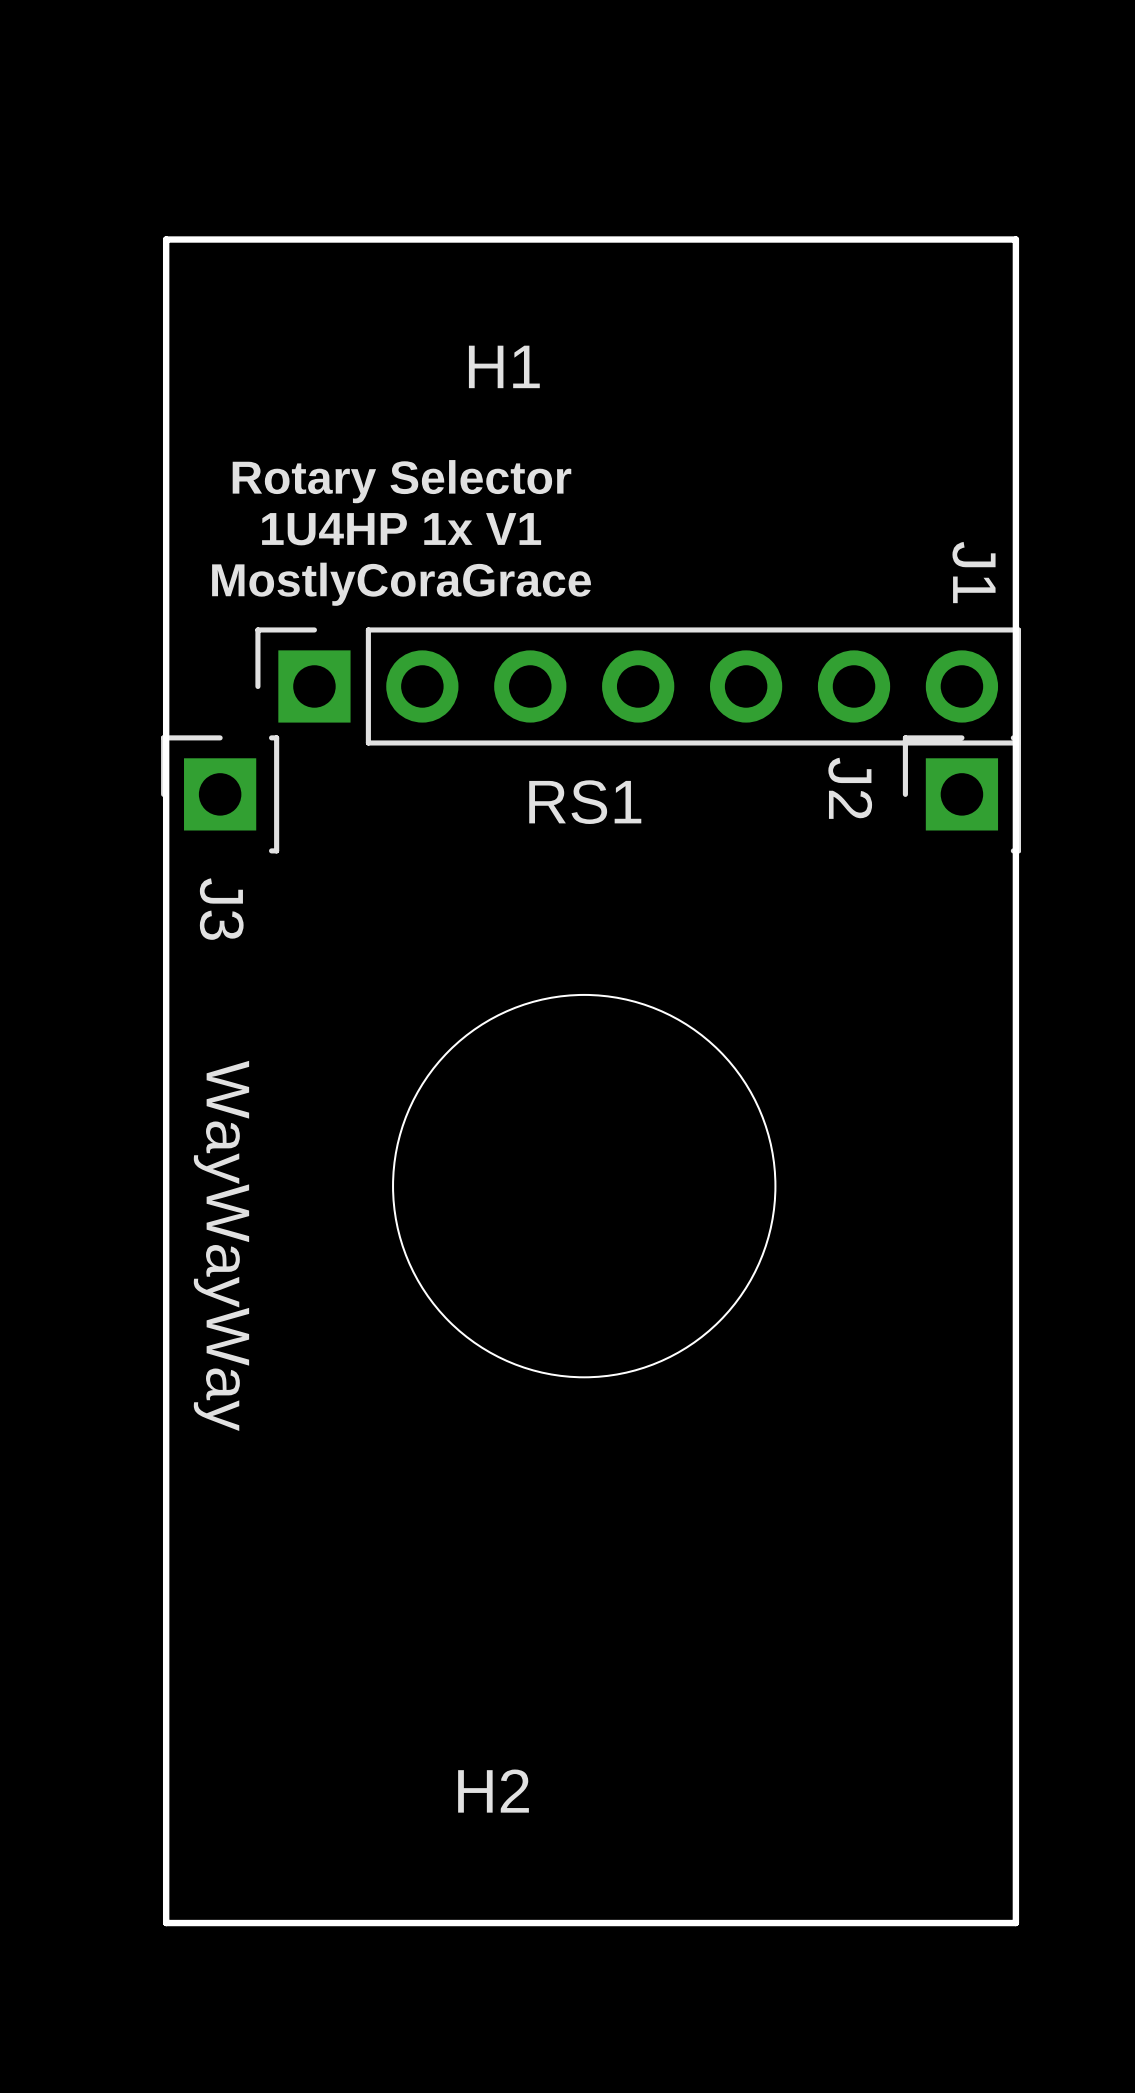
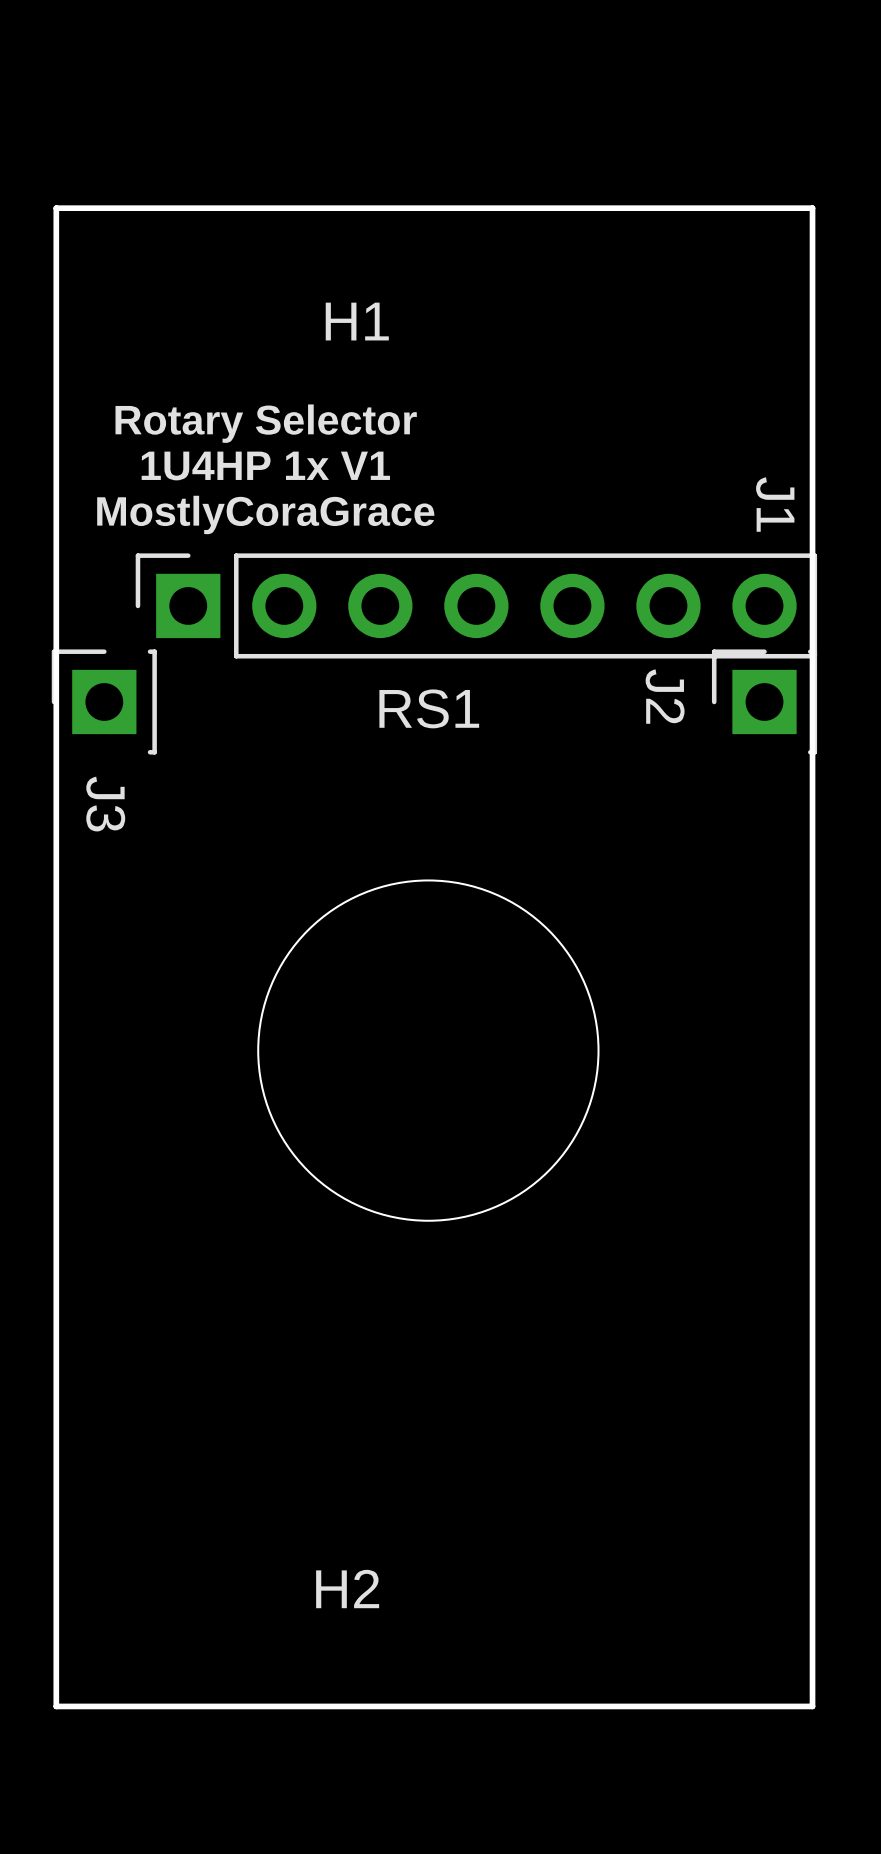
text: WayWayWay (221, 1245) -> none

